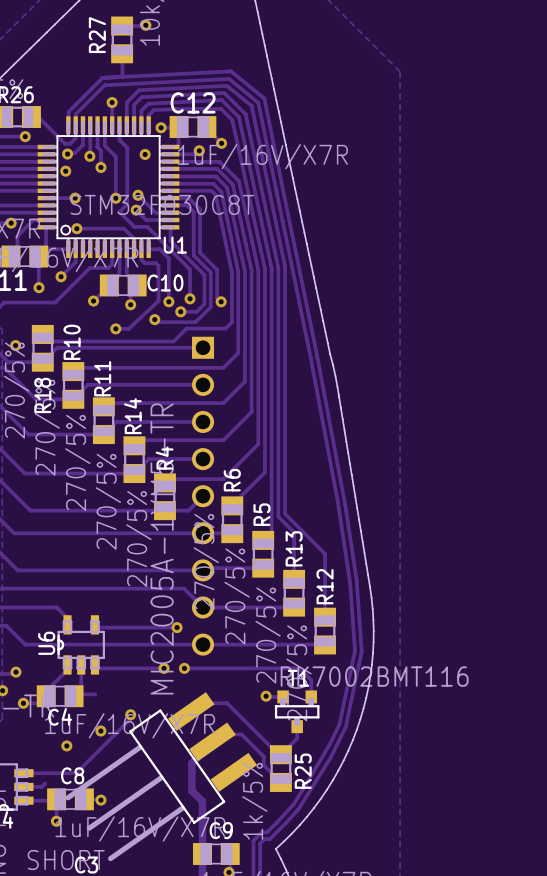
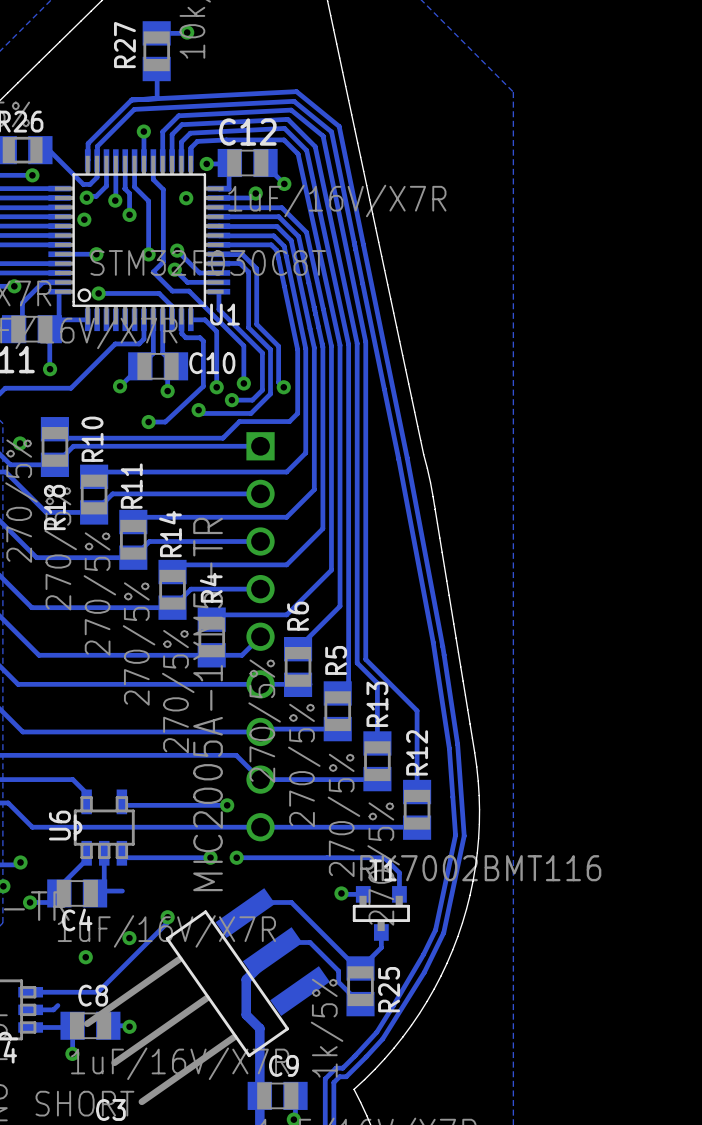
track: (75, 249) (75, 262) (61, 276) -> none
via: (61, 276) -> none

